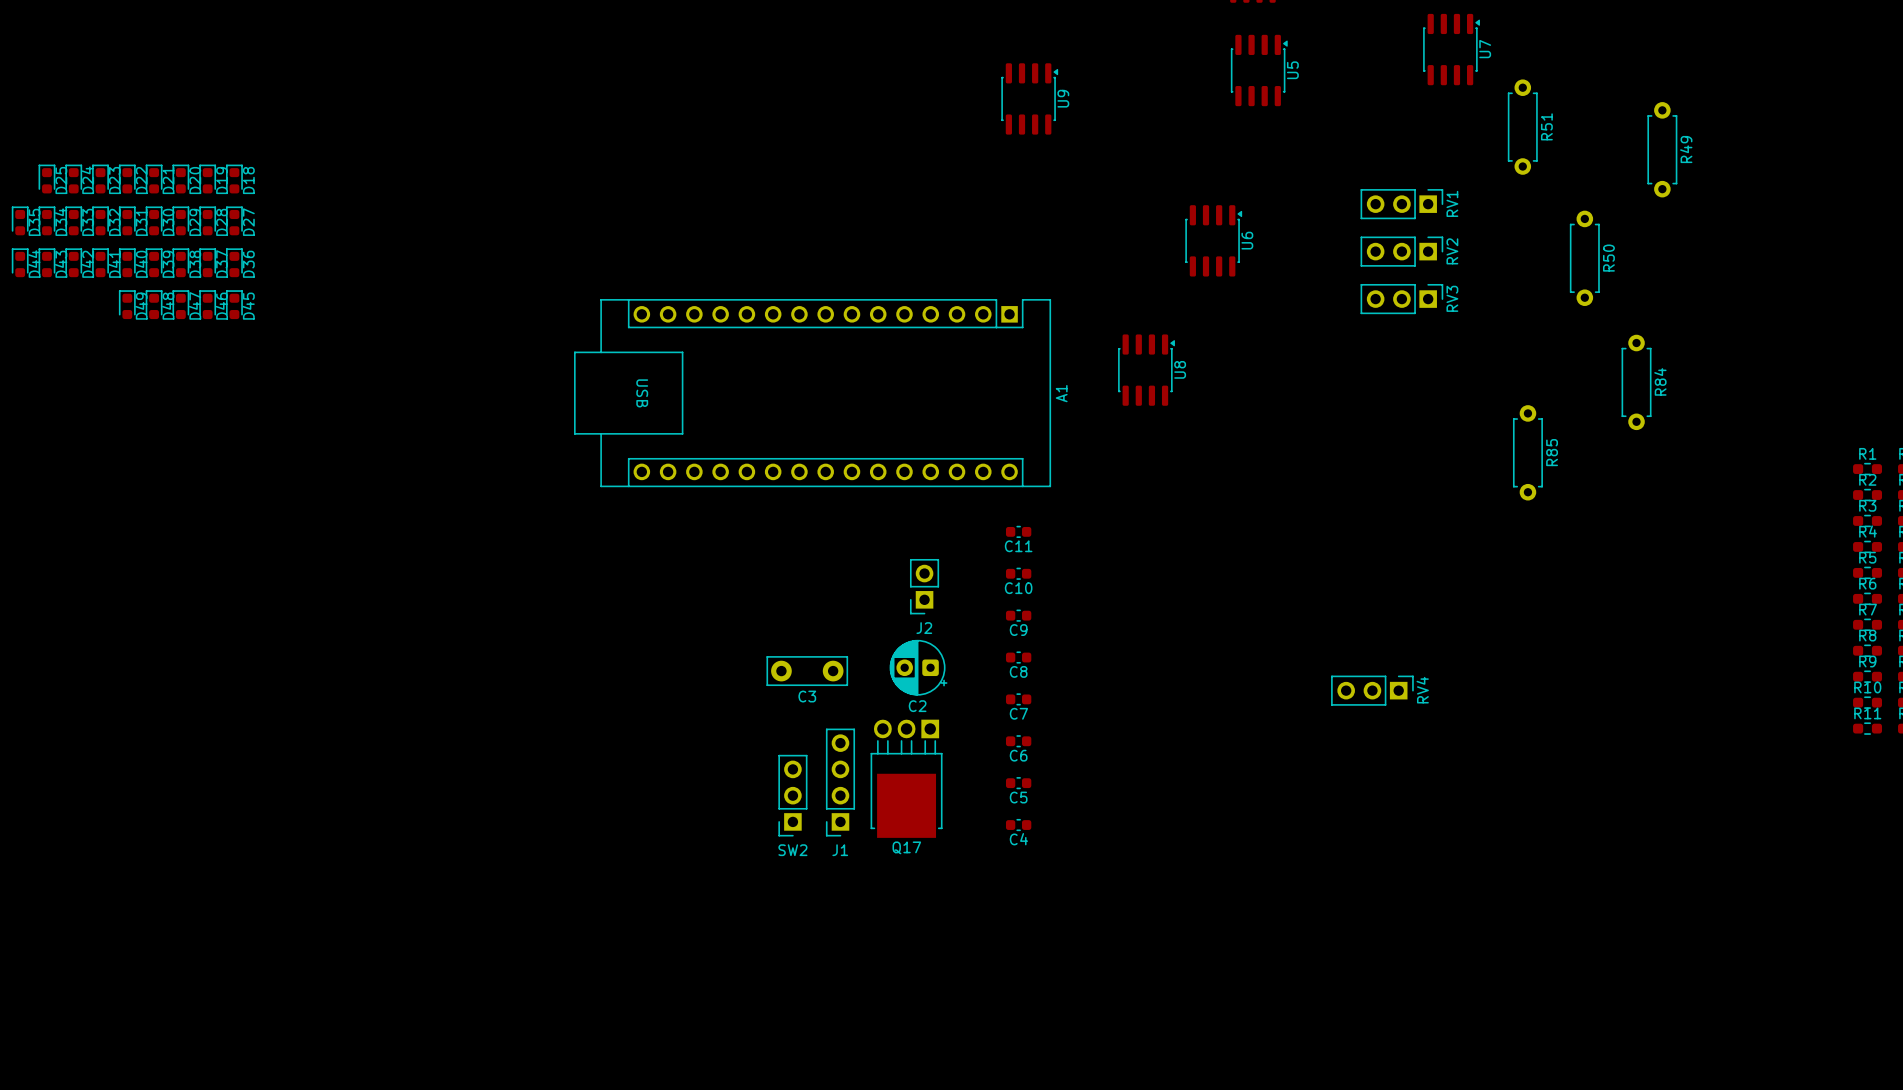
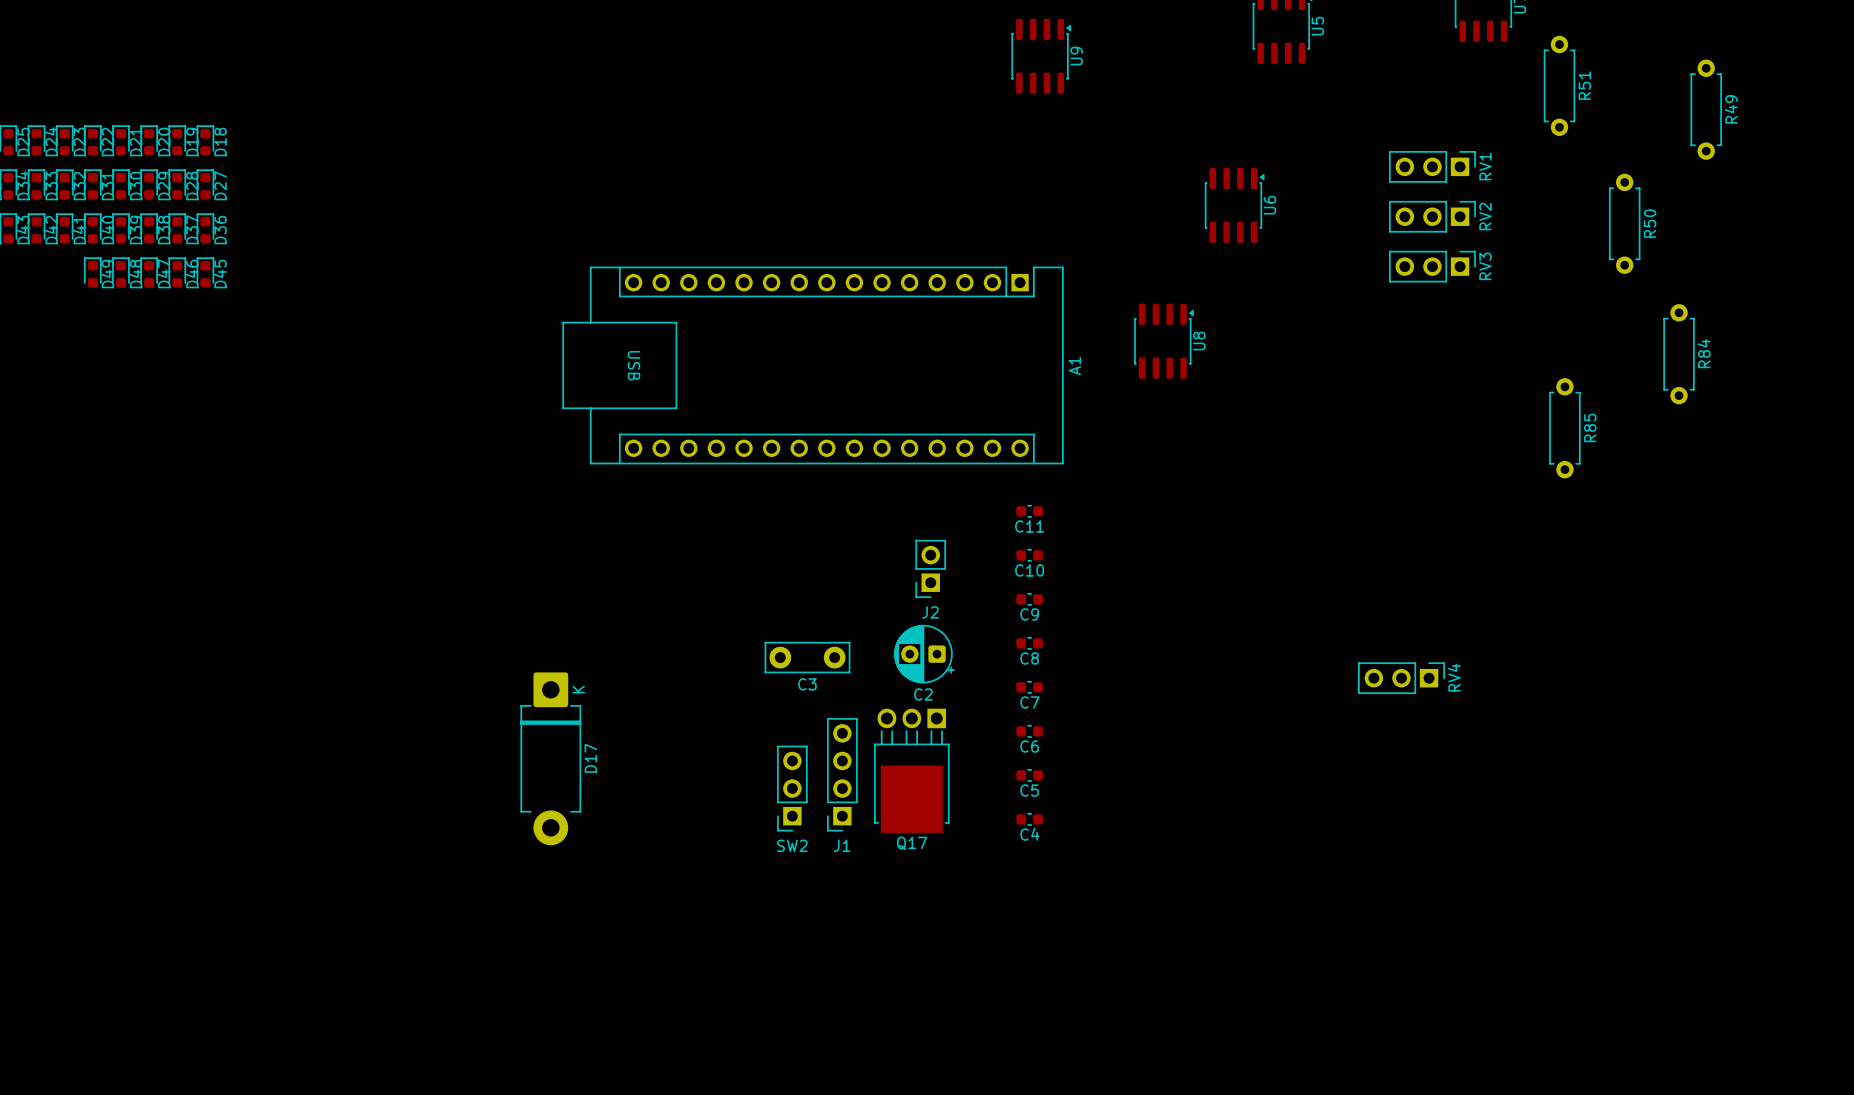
D17: none -> (550, 758)

